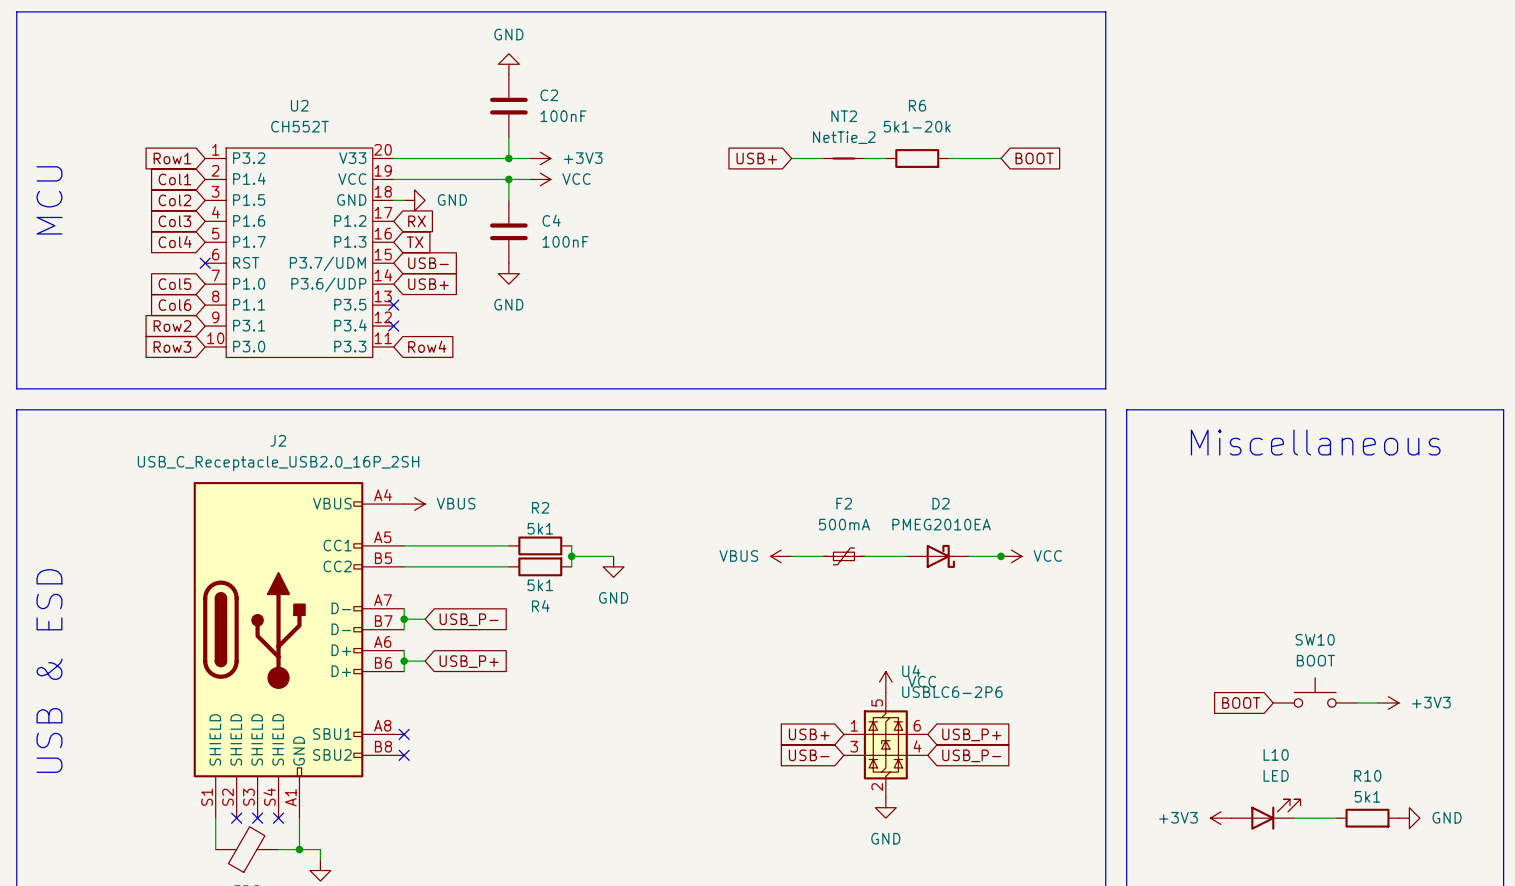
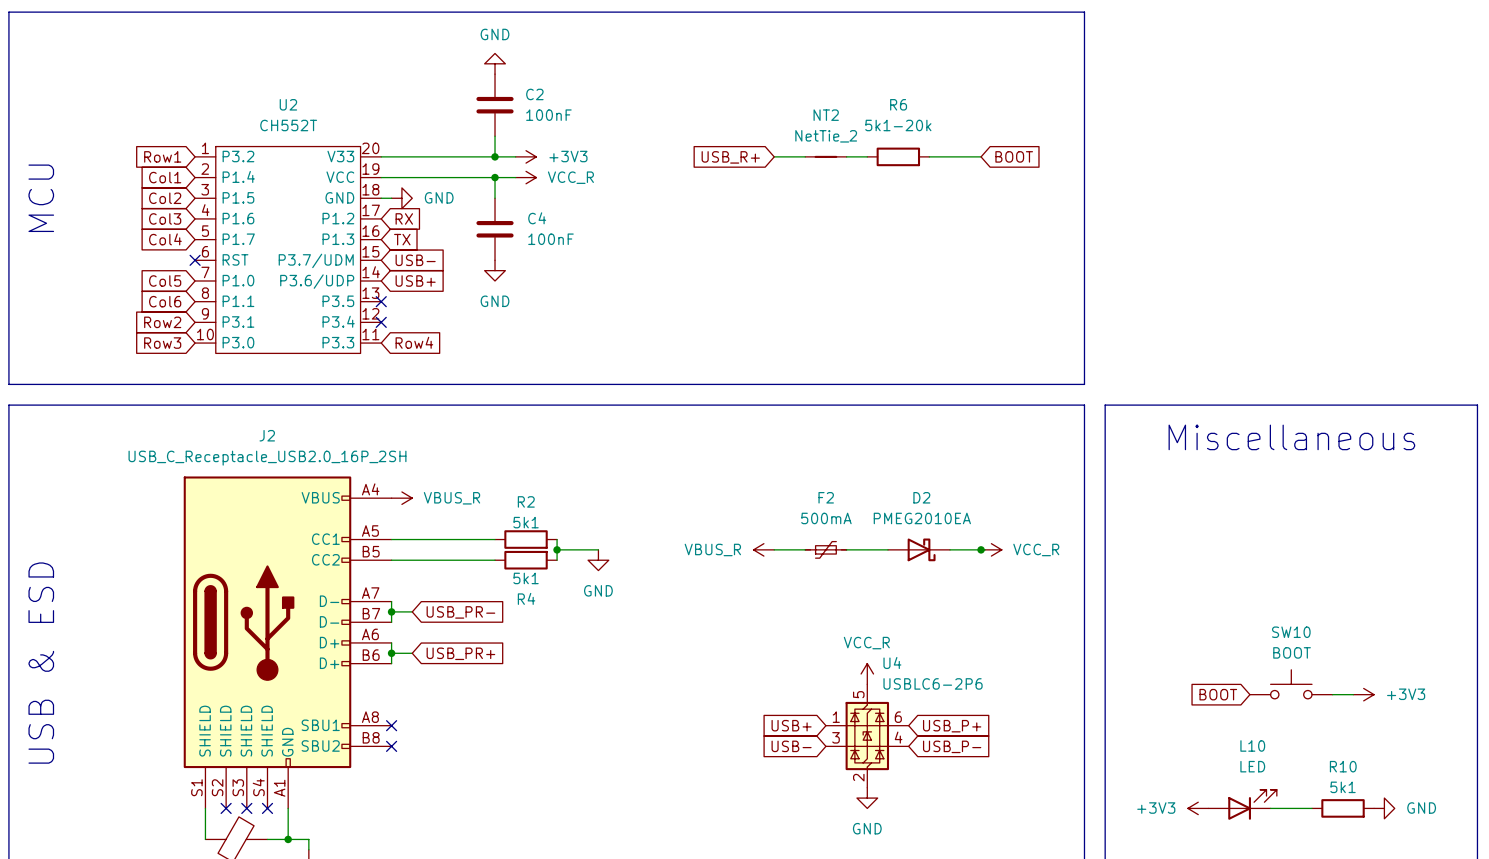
global label: USB+ (756, 158) -> USB_R+ (730, 157)
power symbol: VCC (540, 179) -> VCC_R (526, 177)
power symbol: VBUS (414, 504) -> VBUS_R (401, 498)
power symbol: VBUS (781, 556) -> VBUS_R (763, 549)
power symbol: VCC (1011, 556) -> VCC_R (991, 549)
global label: USB_P- (469, 619) -> USB_PR- (460, 612)
global label: USB_P+ (469, 661) -> USB_PR+ (460, 653)
power symbol: VCC (885, 682) -> VCC_R (867, 673)

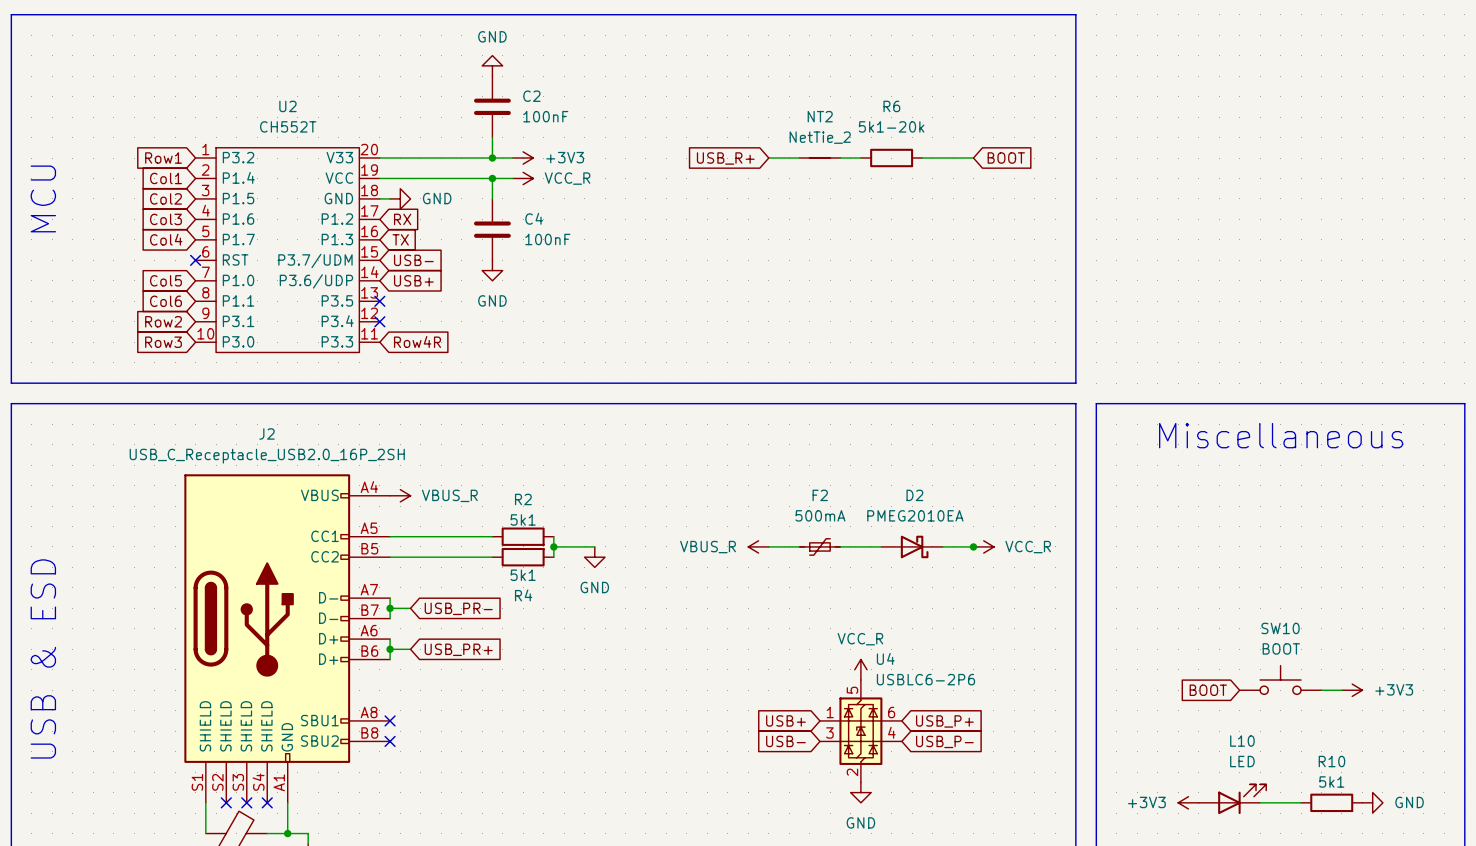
global label: Row4 (414, 342) -> Row4R (417, 341)

